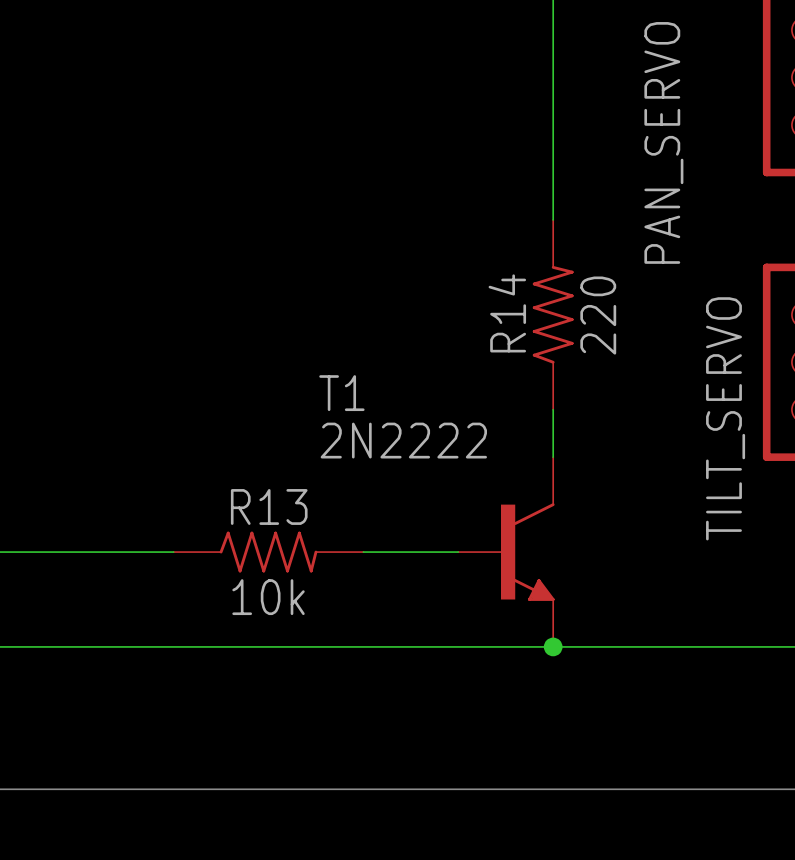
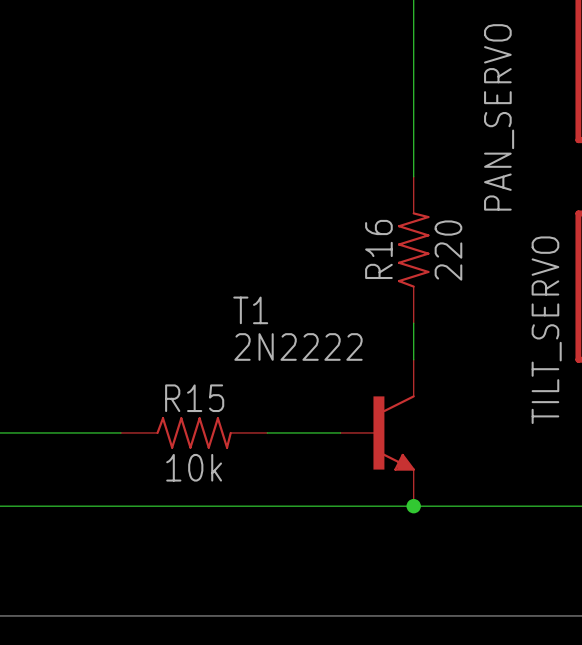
R14 name: R14 (507, 313) -> R16 (378, 249)
R13 name: R13 (269, 506) -> R15 (194, 398)

